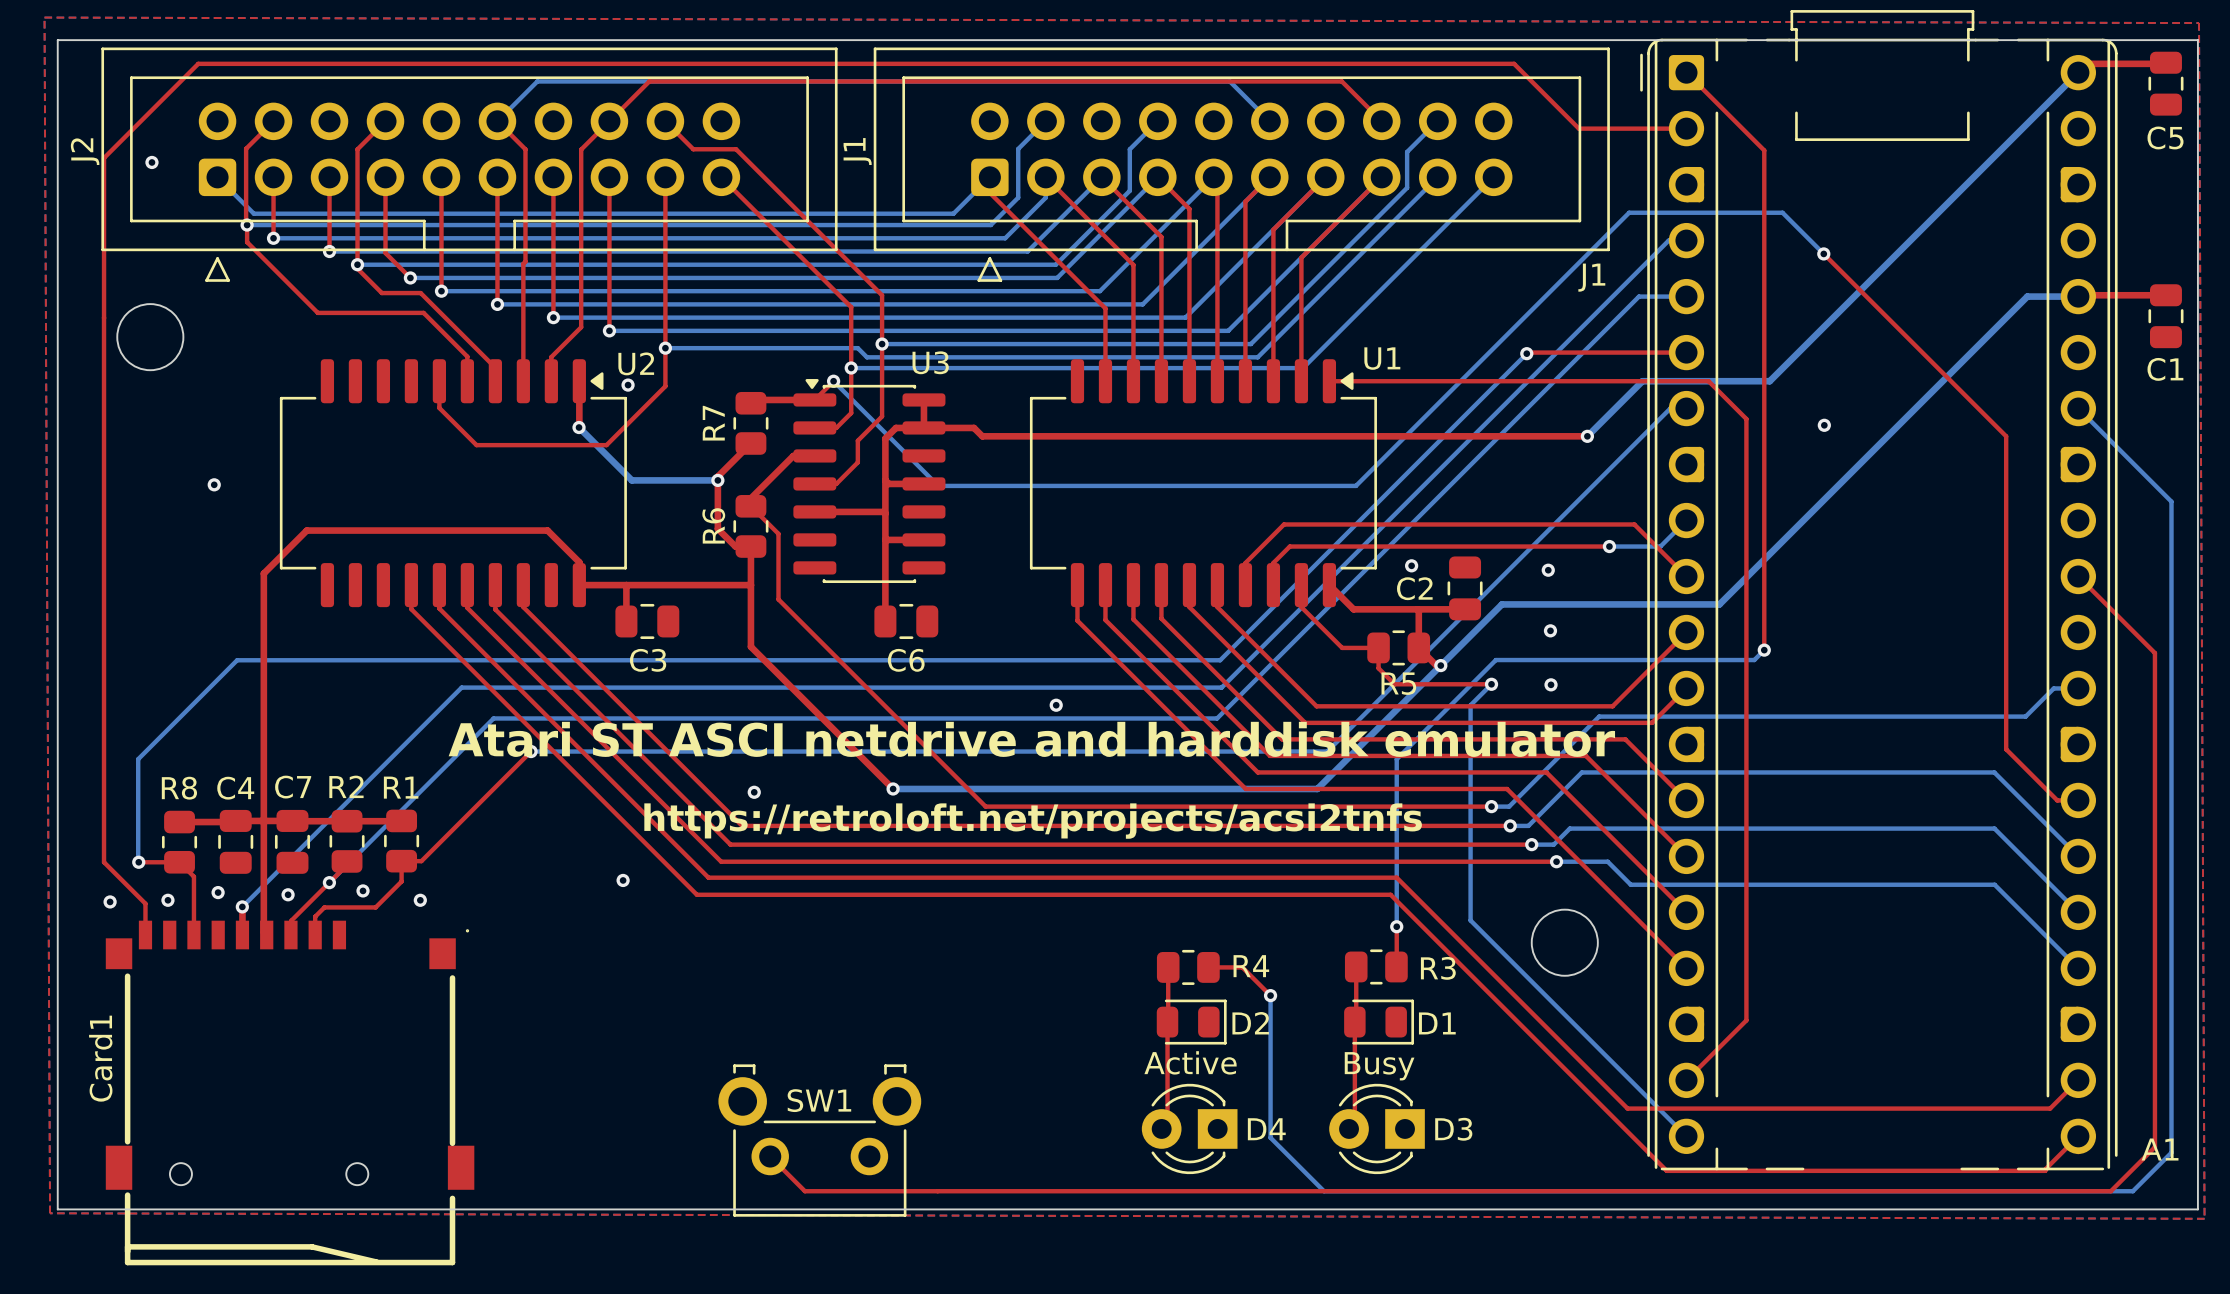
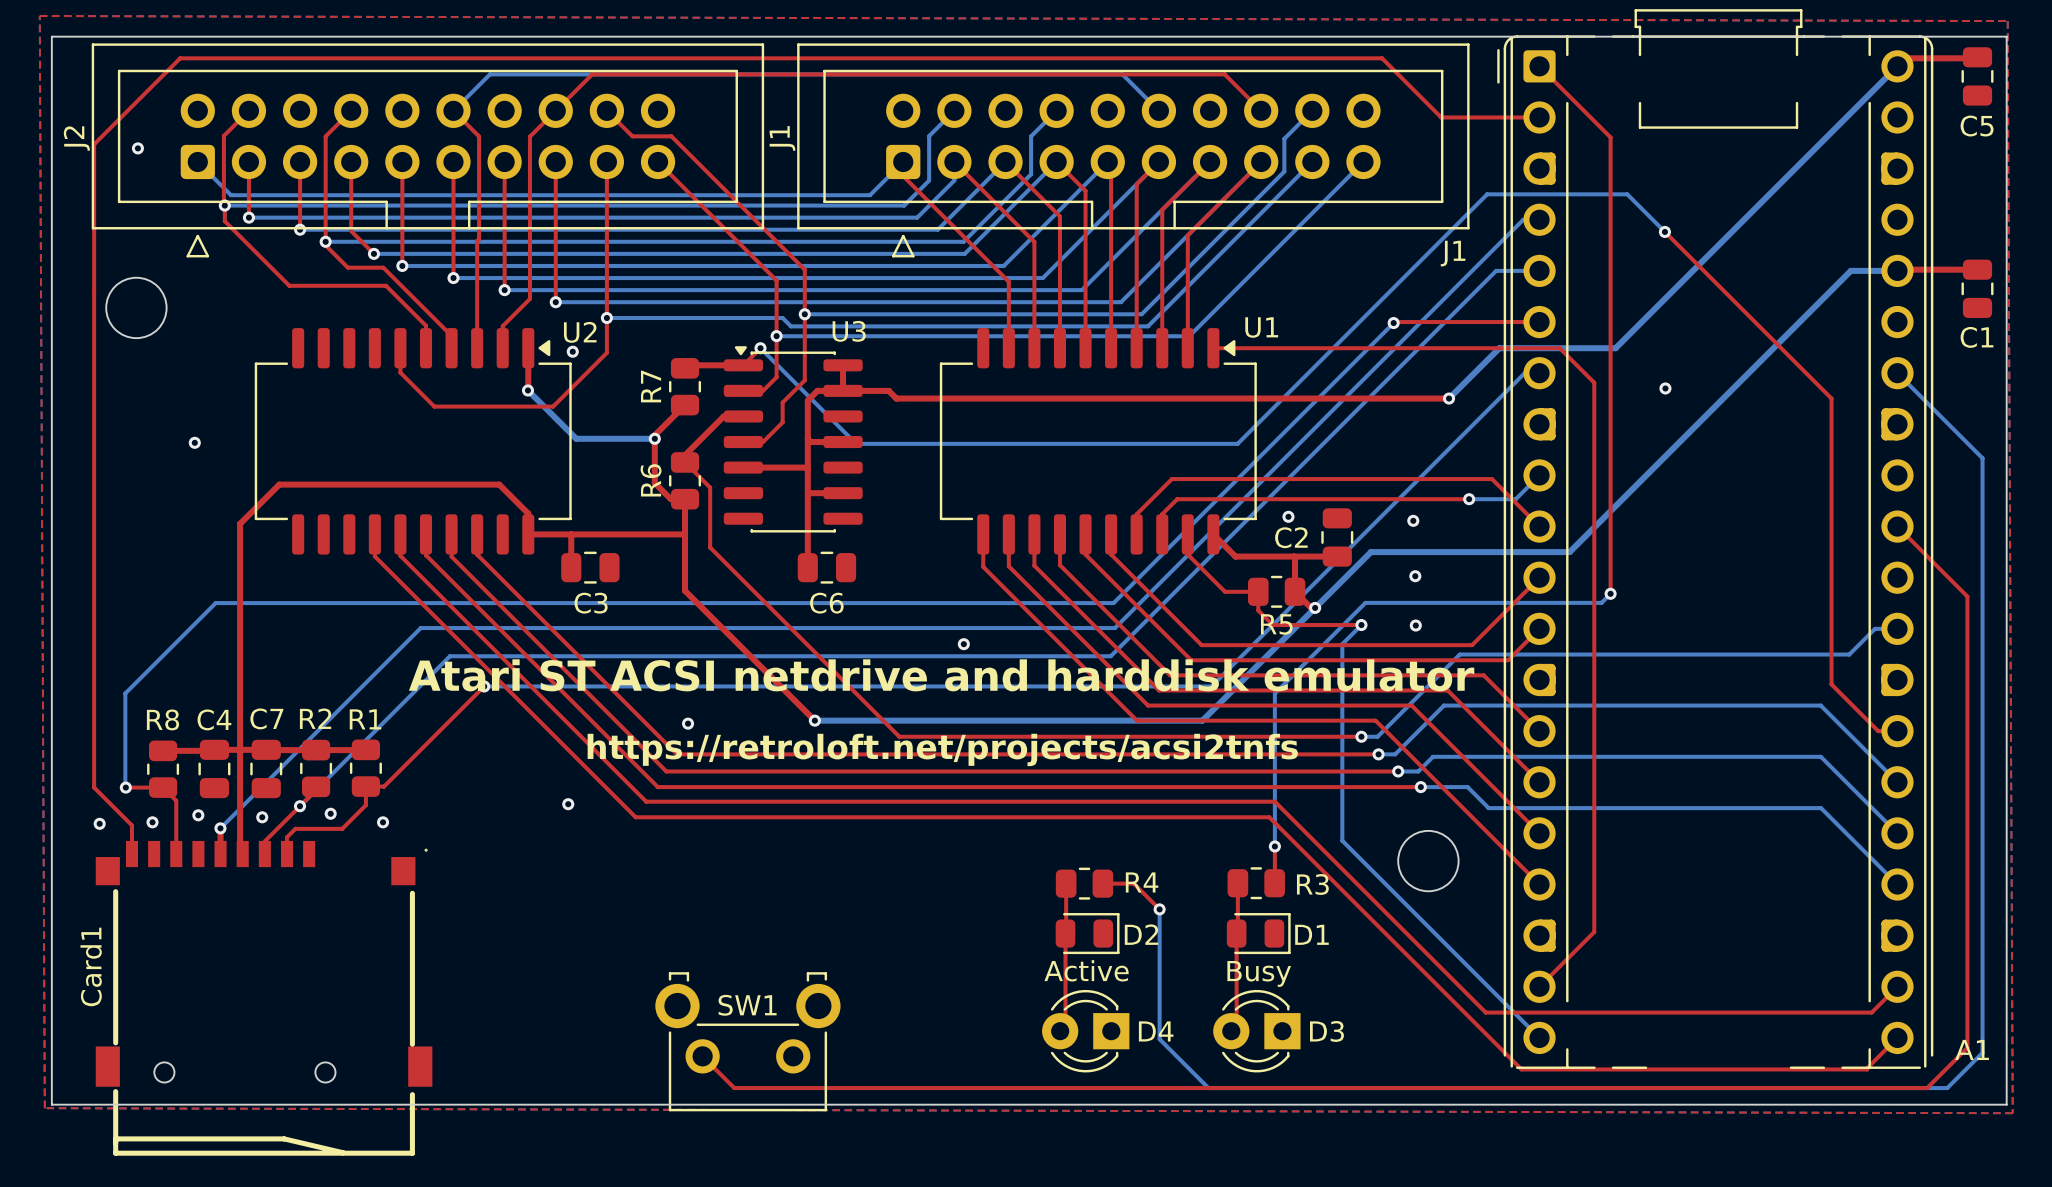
text: Atari ST ASCI netdrive and harddisk emulator (1031, 739) -> Atari ST ACSI netdrive and harddisk emulator (941, 675)

